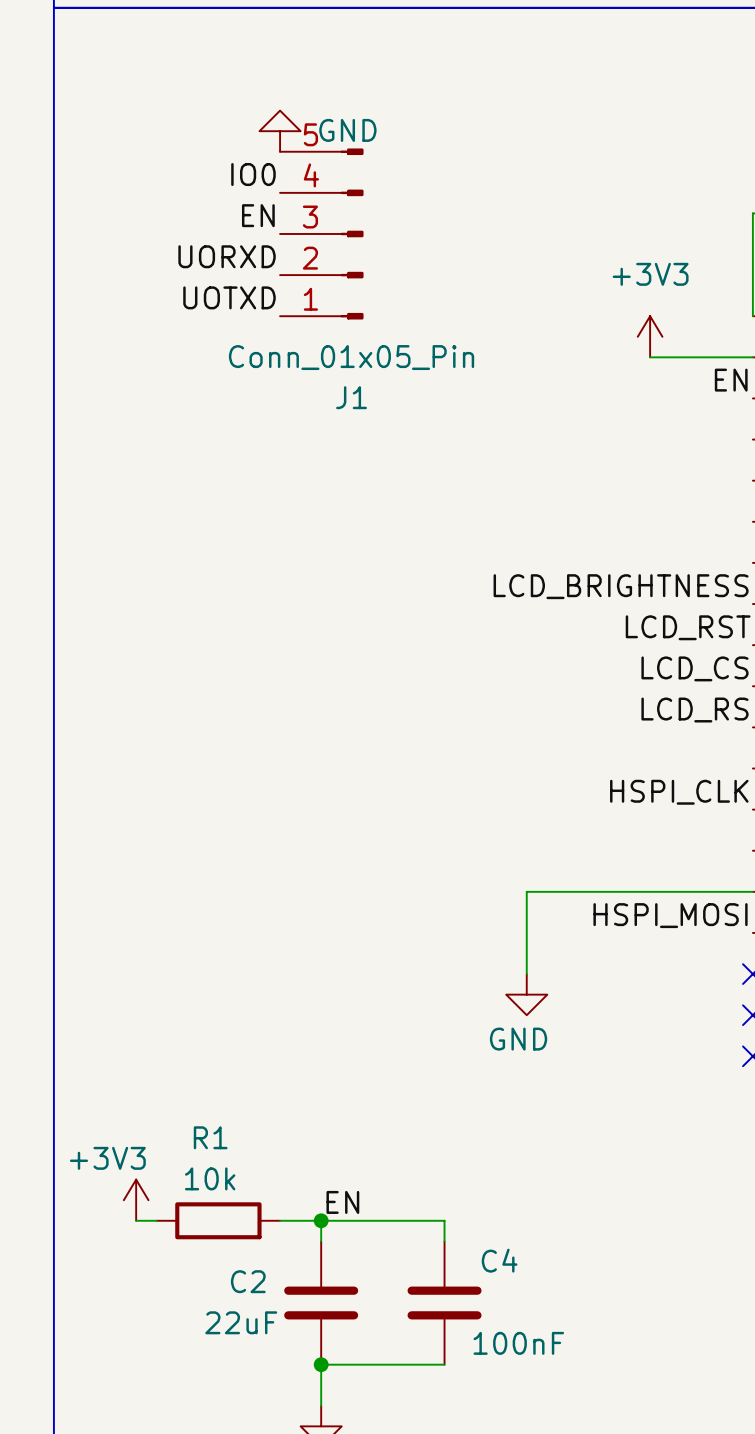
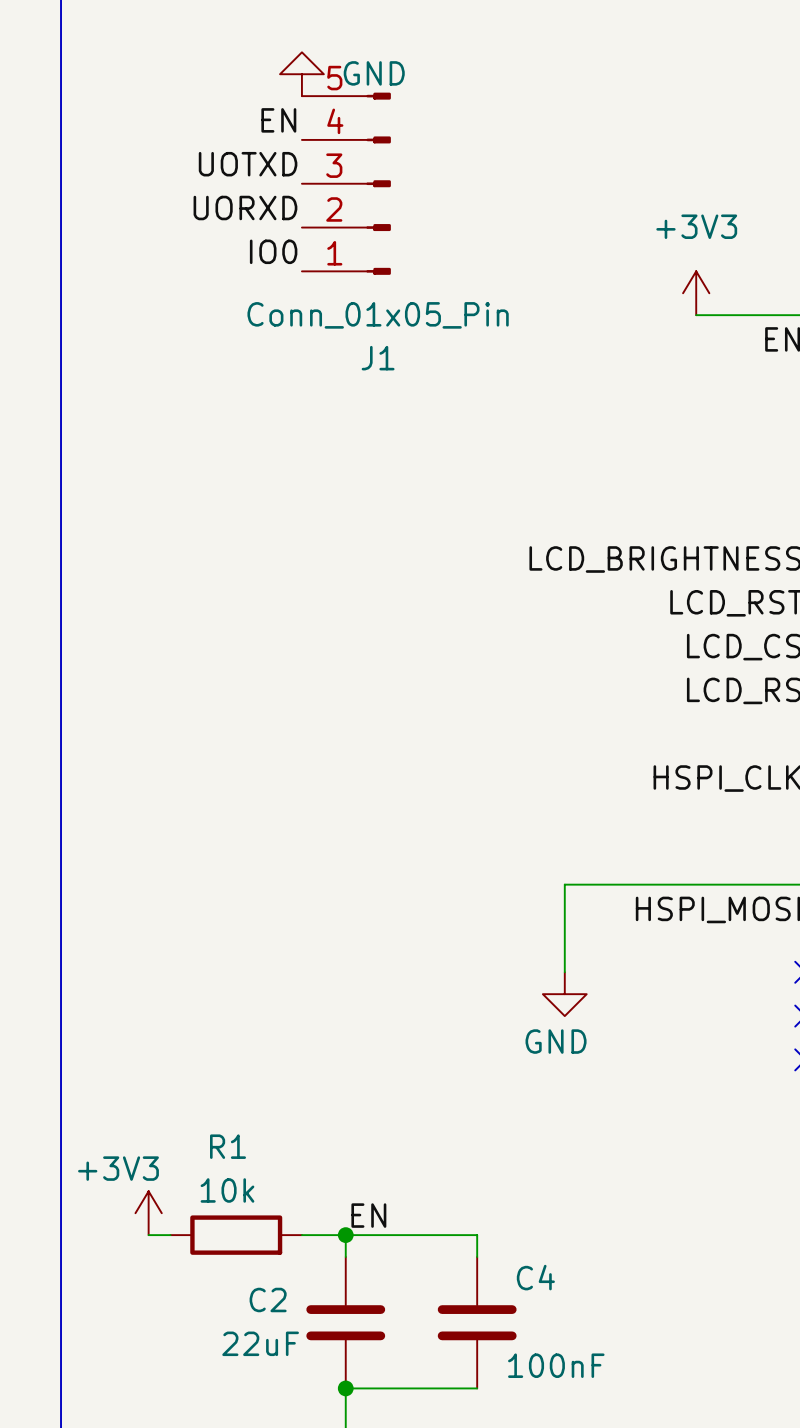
label: IO0 (253, 174) -> EN (278, 120)
label: EN (258, 215) -> UOTXD (248, 164)
label: UOTXD (229, 297) -> IO0 (273, 251)

